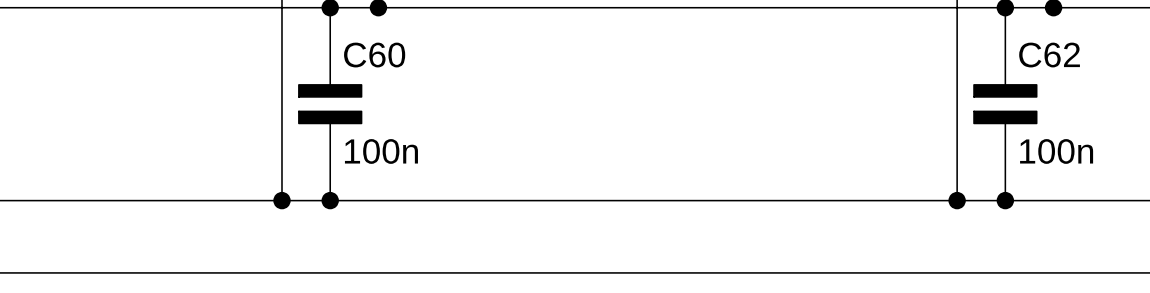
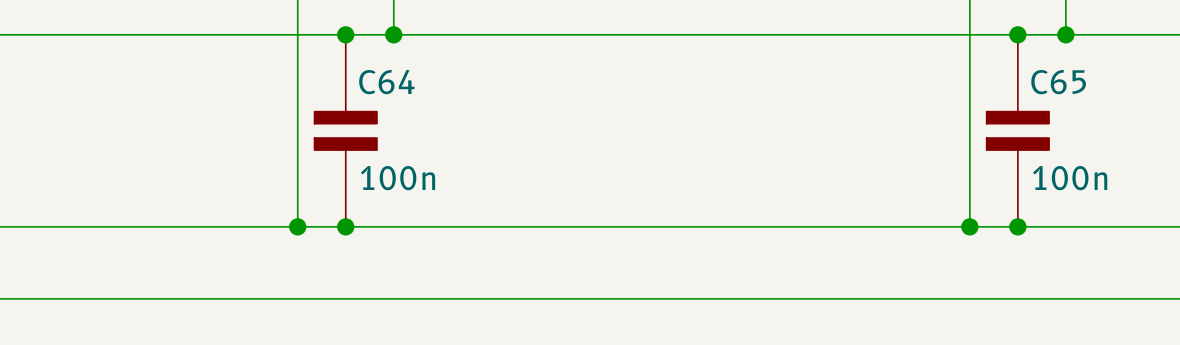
C60 name: C60 (374, 55) -> C64 (386, 82)
C62 name: C62 (1049, 55) -> C65 (1058, 82)

